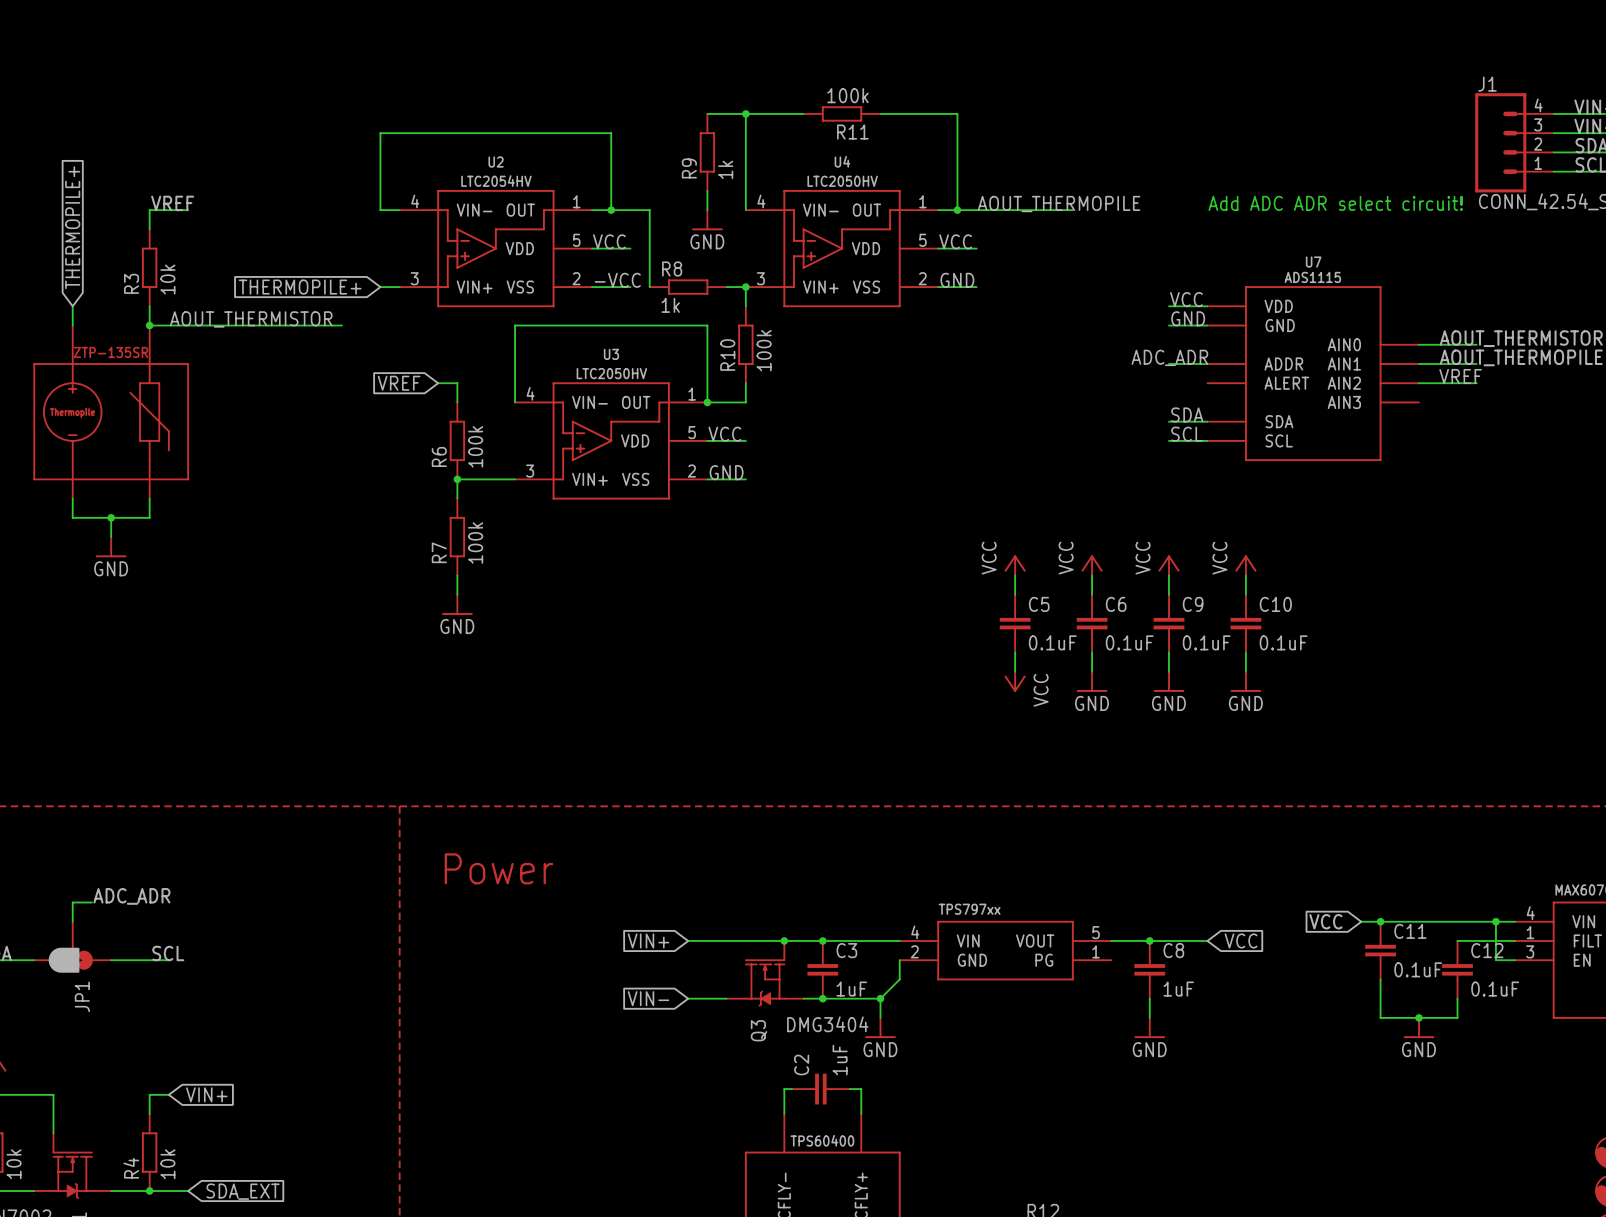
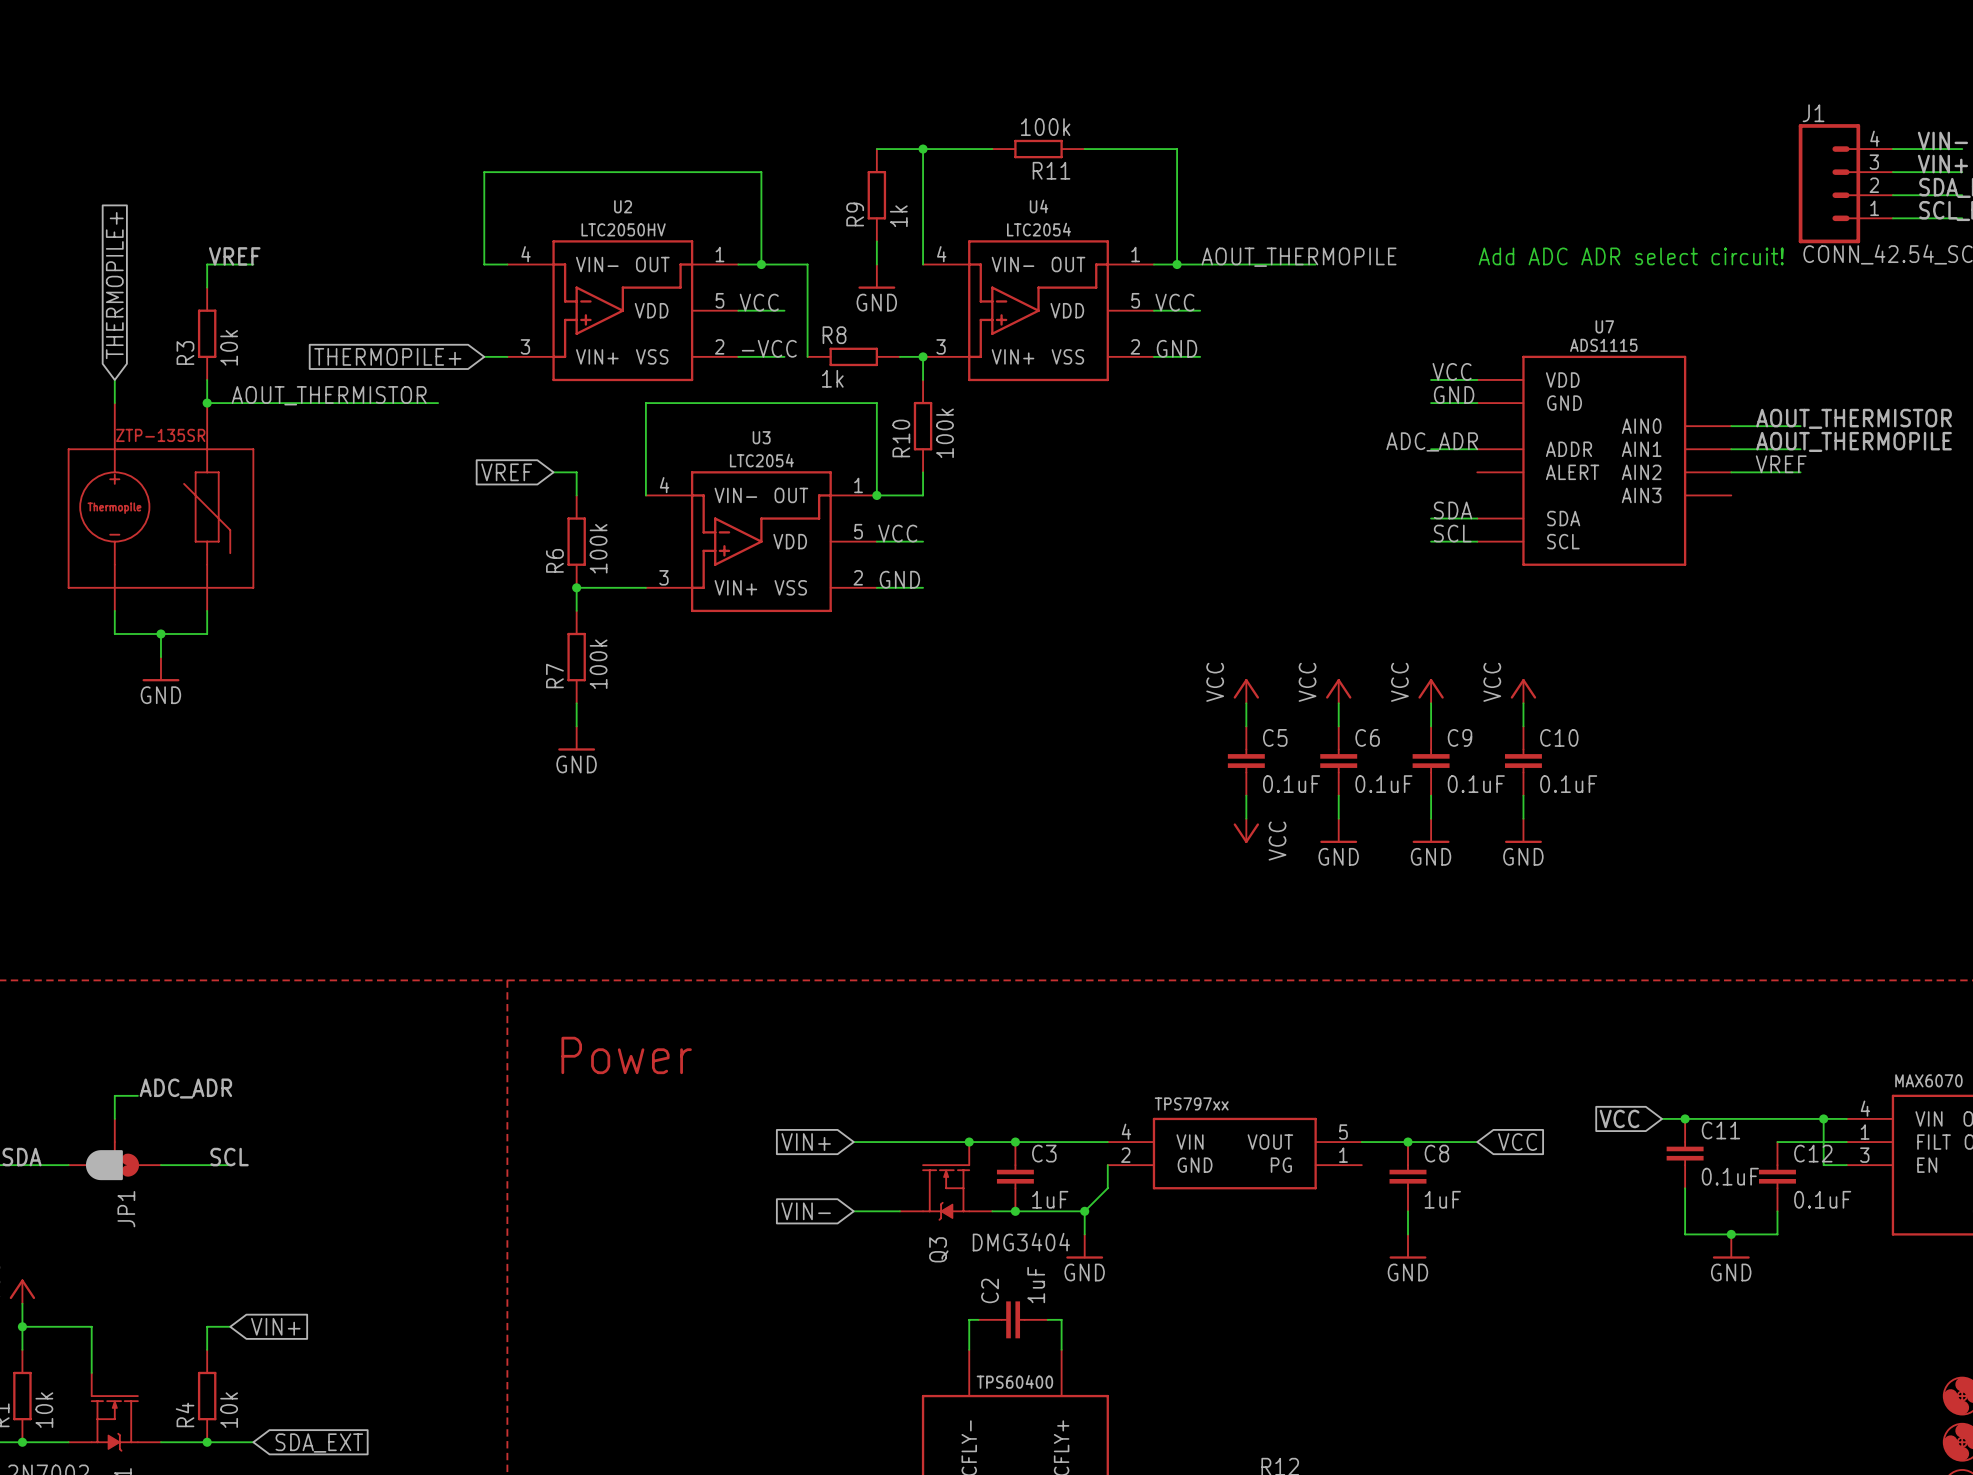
U2 text: LTC2054HV (496, 181) -> LTC2050HV (623, 229)
U4 text: LTC2050HV (842, 181) -> LTC2054 (1039, 229)
U3 text: LTC2050HV (611, 373) -> LTC2054 (761, 460)

